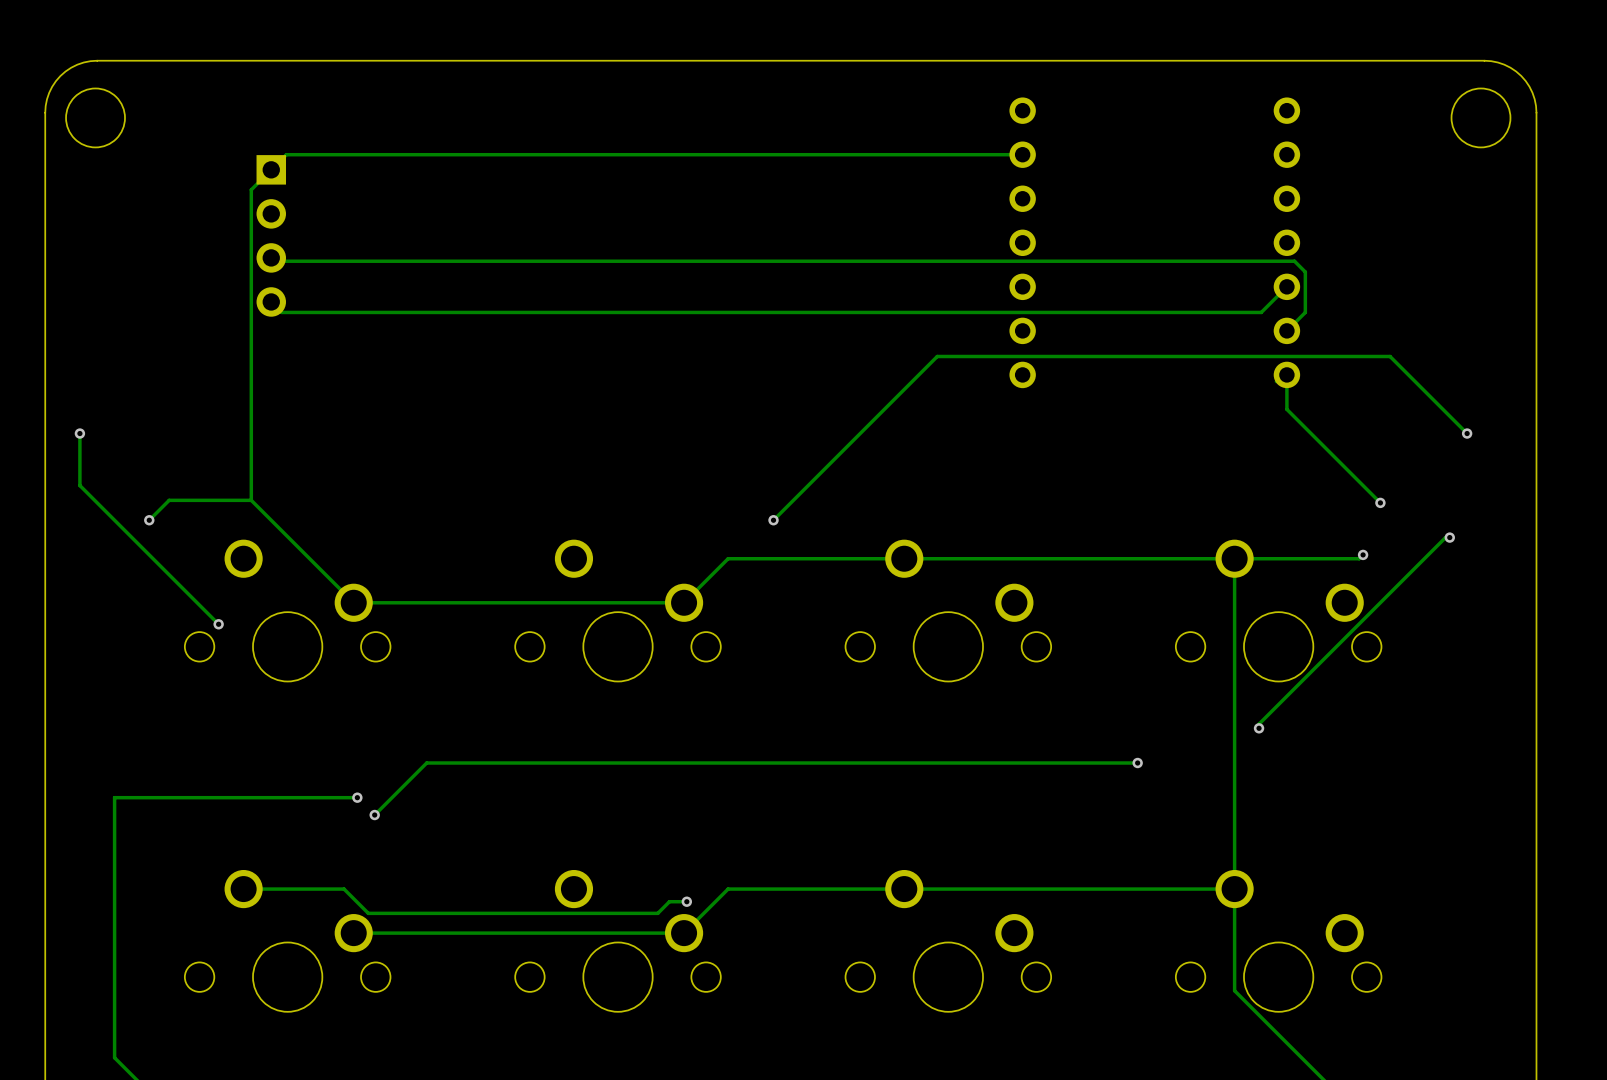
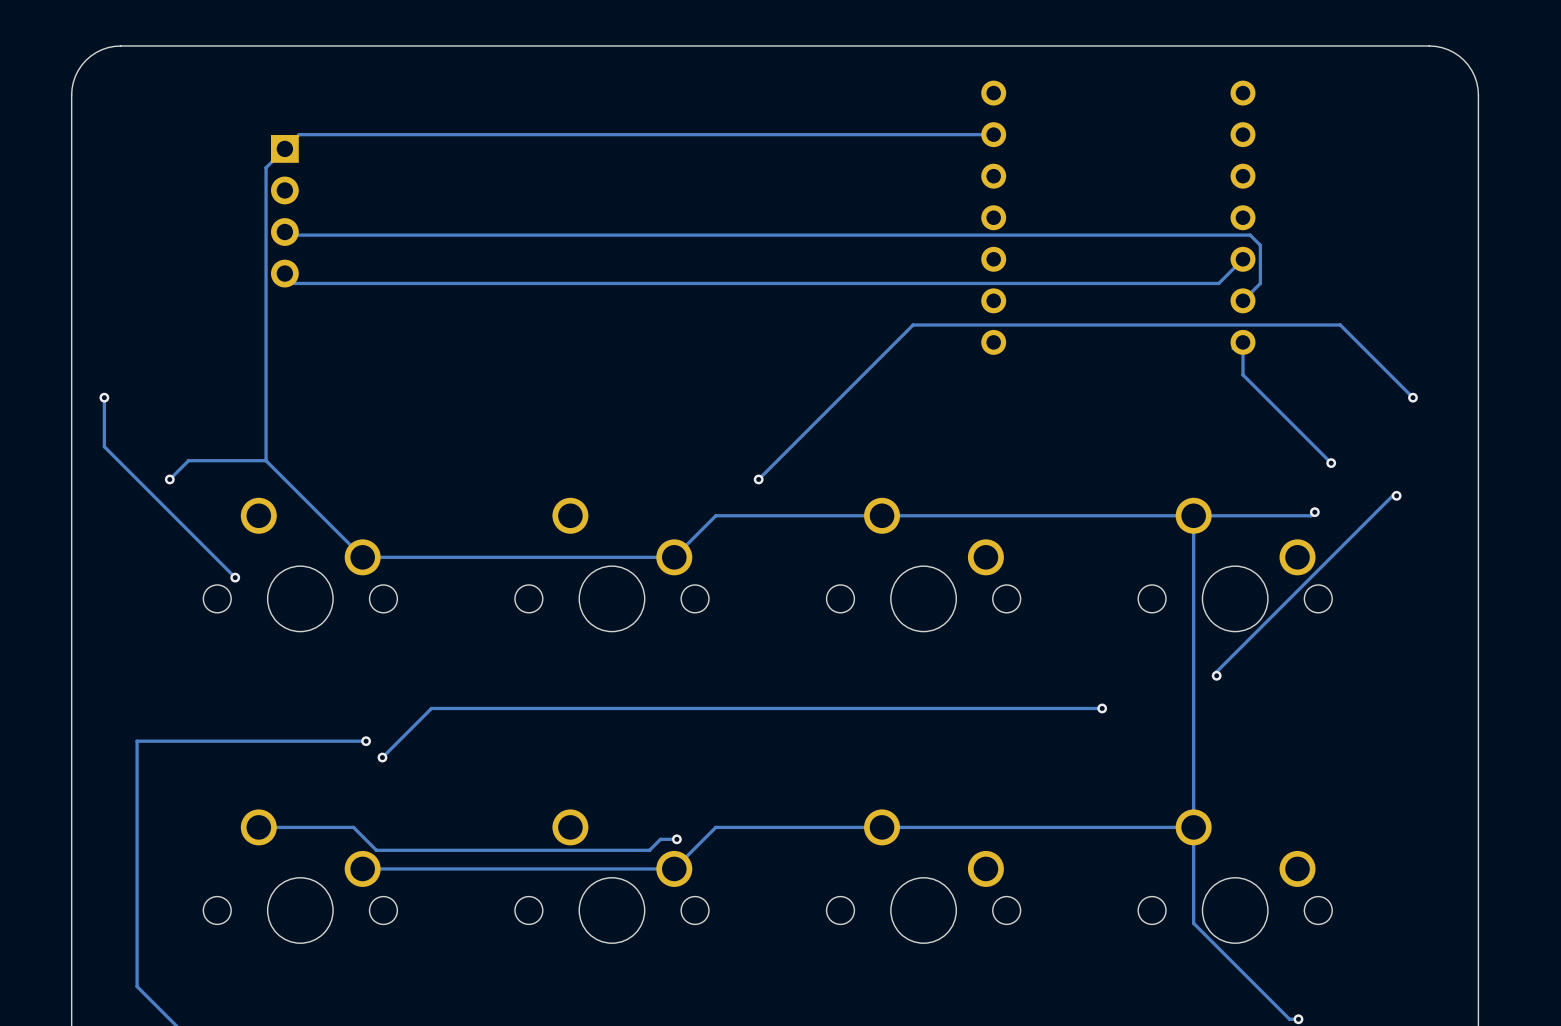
round board edge: [65, 88, 126, 148] -> none
round board edge: [1451, 88, 1511, 148] -> none

